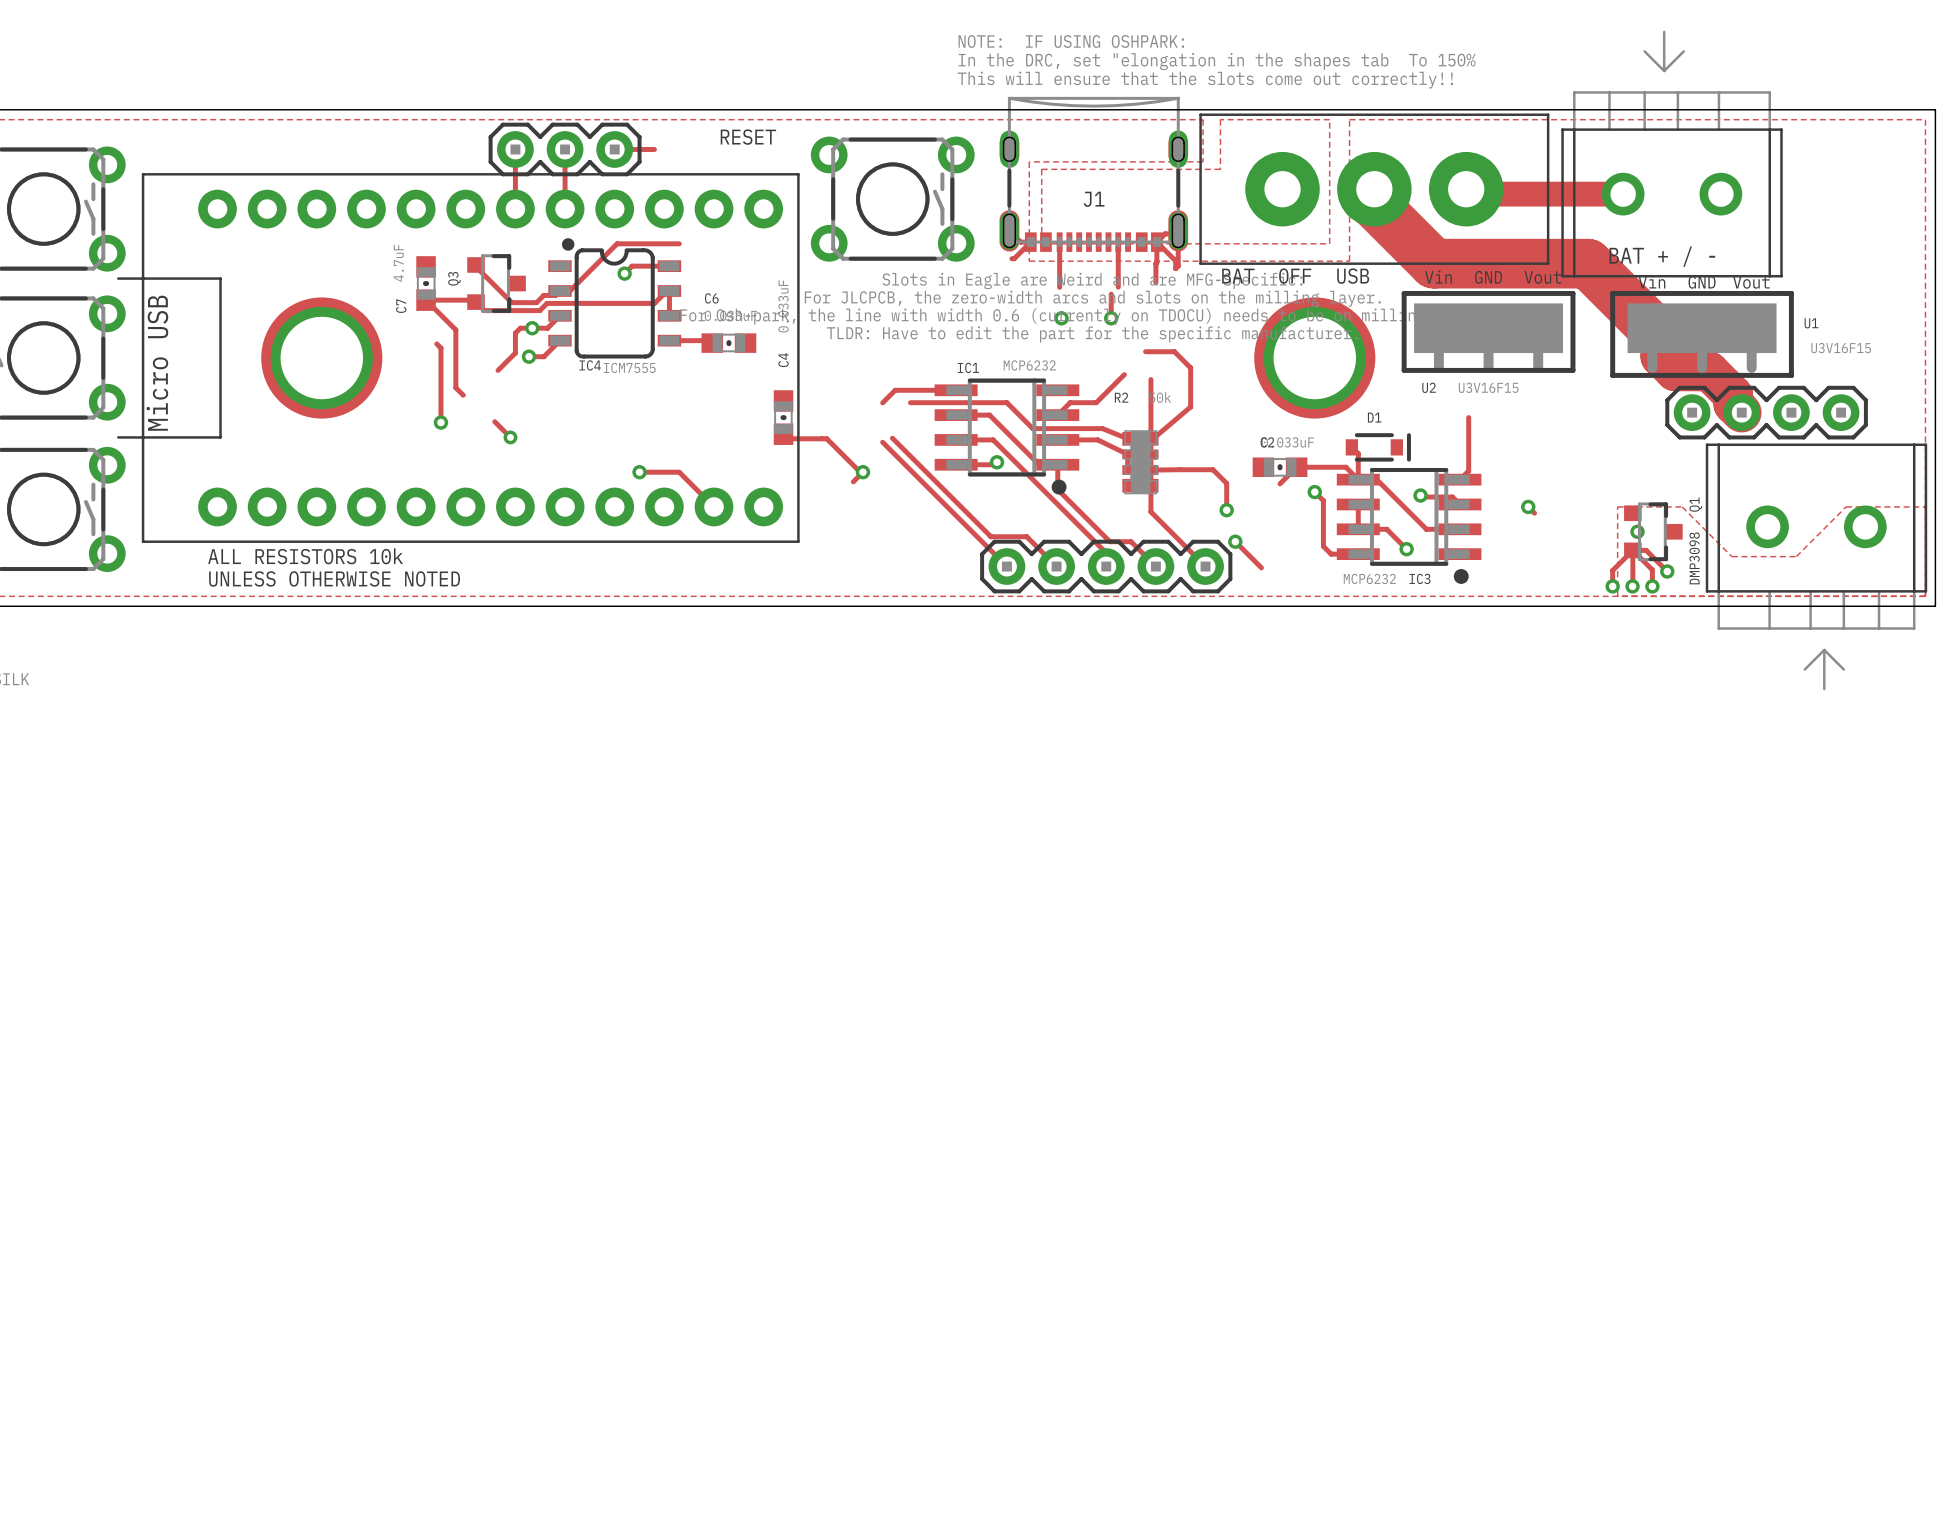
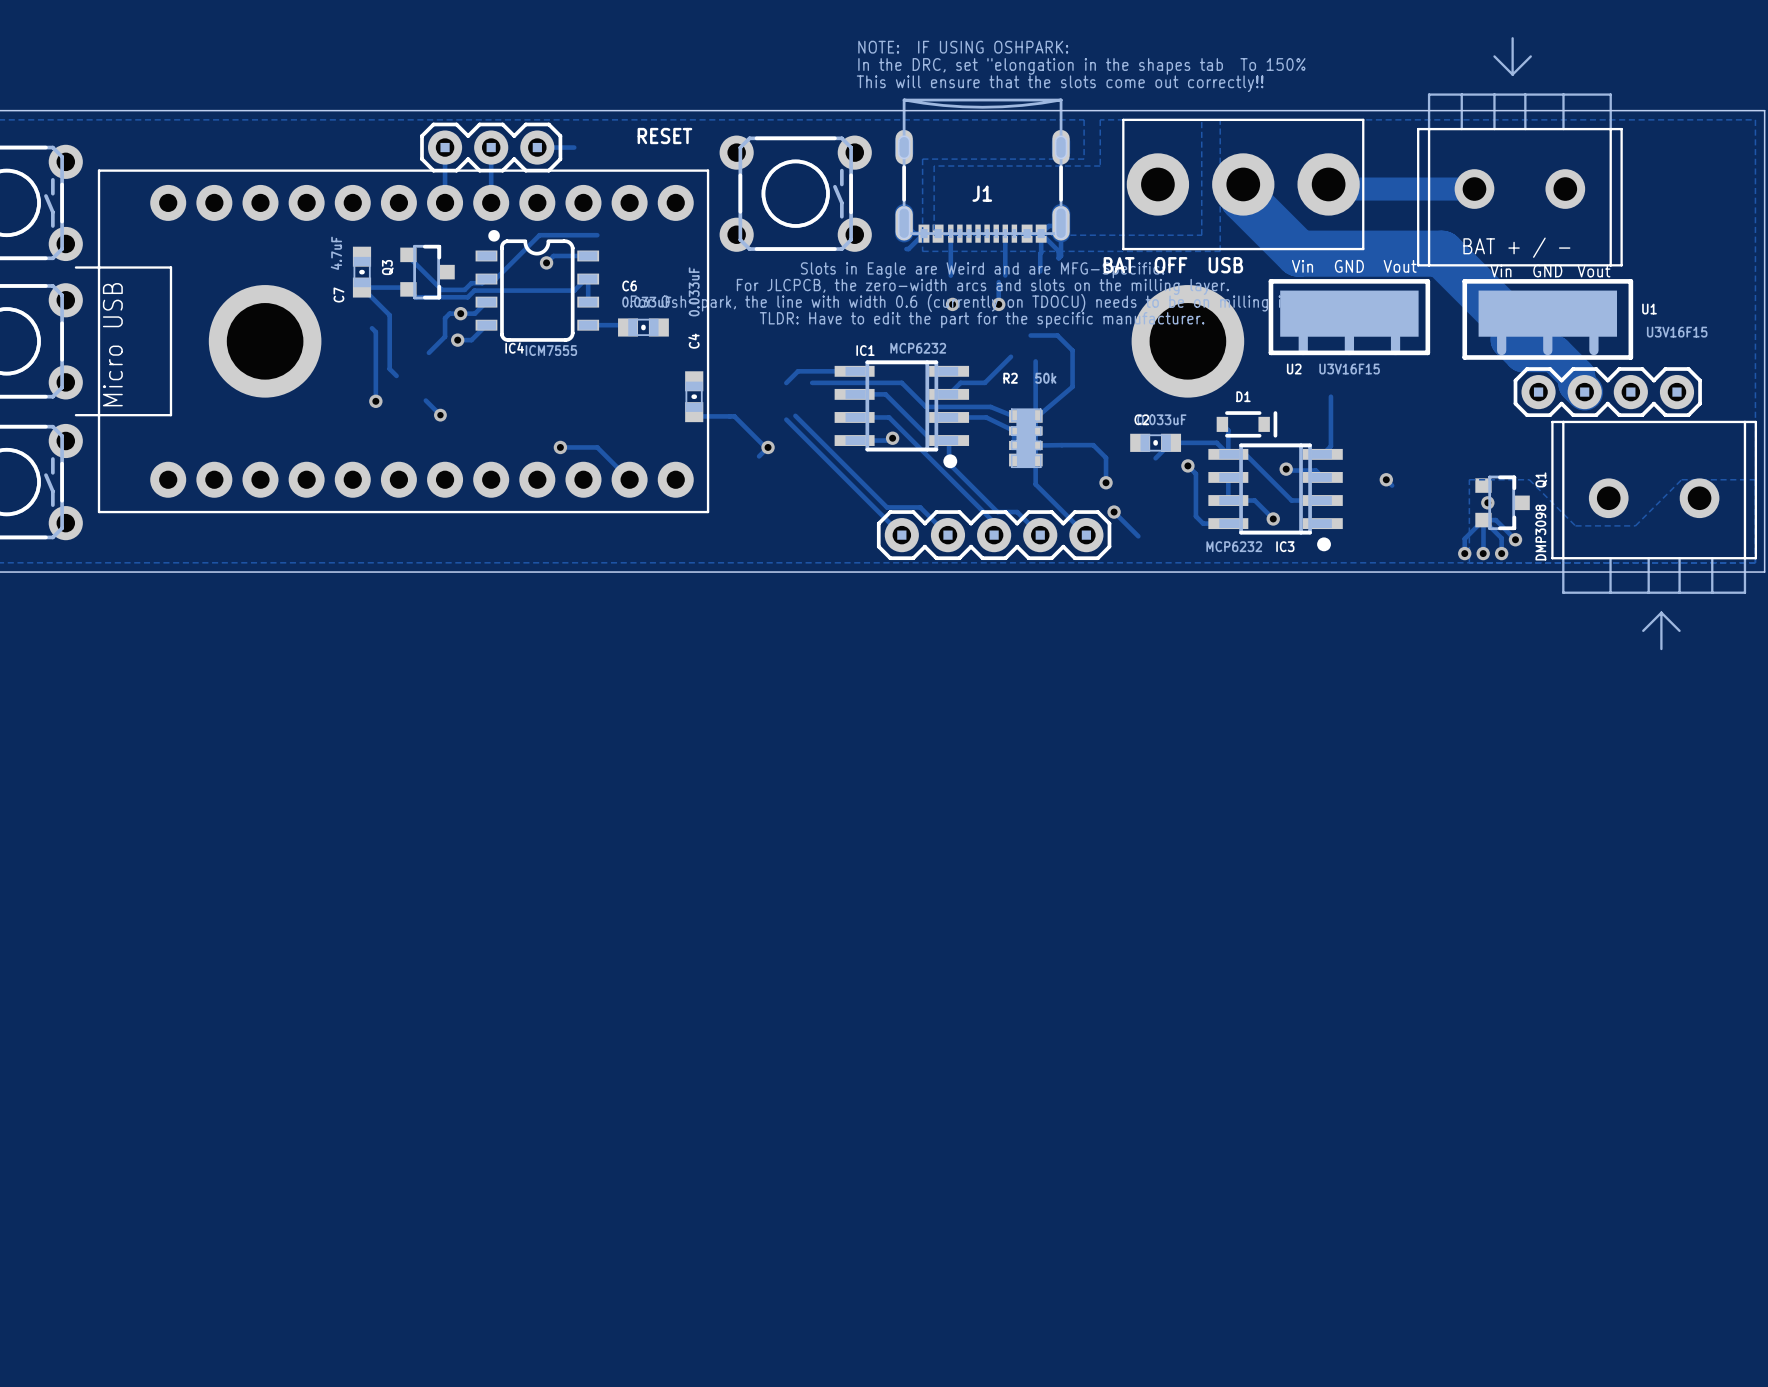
part footprint: [1199, 113, 1550, 265] -> [1122, 118, 1365, 251]
text: ALL RESISTORS 10k (305, 556) -> none
text: UNLESS OTHERWISE NOTED (334, 578) -> none

